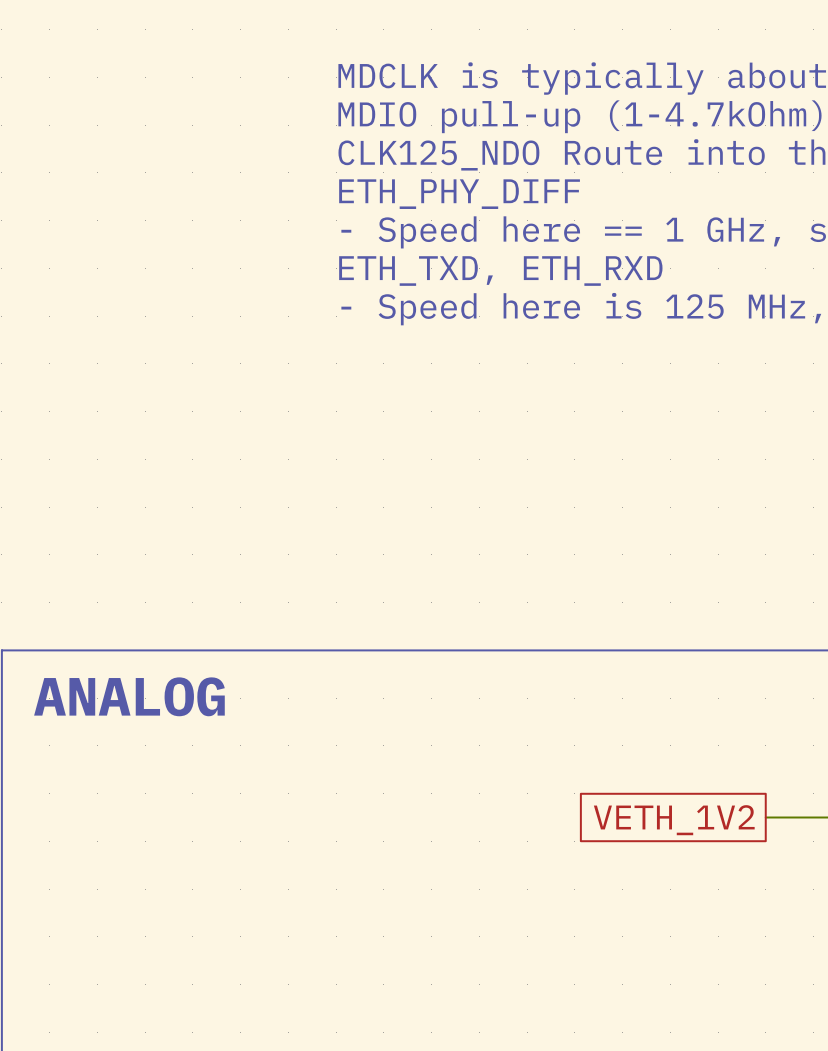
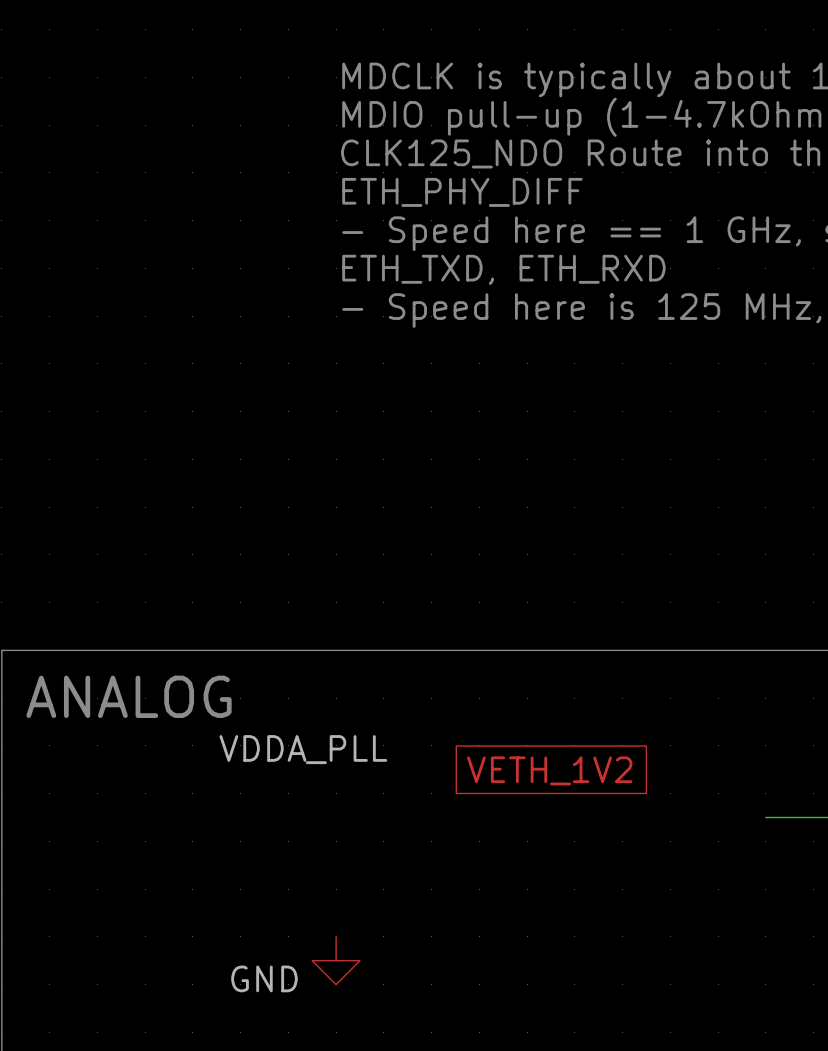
label: none -> VDDA_PLL (303, 749)
global label position: VETH_1V2 (674, 820) -> VETH_1V2 (549, 770)
power symbol: none -> GND (336, 960)

